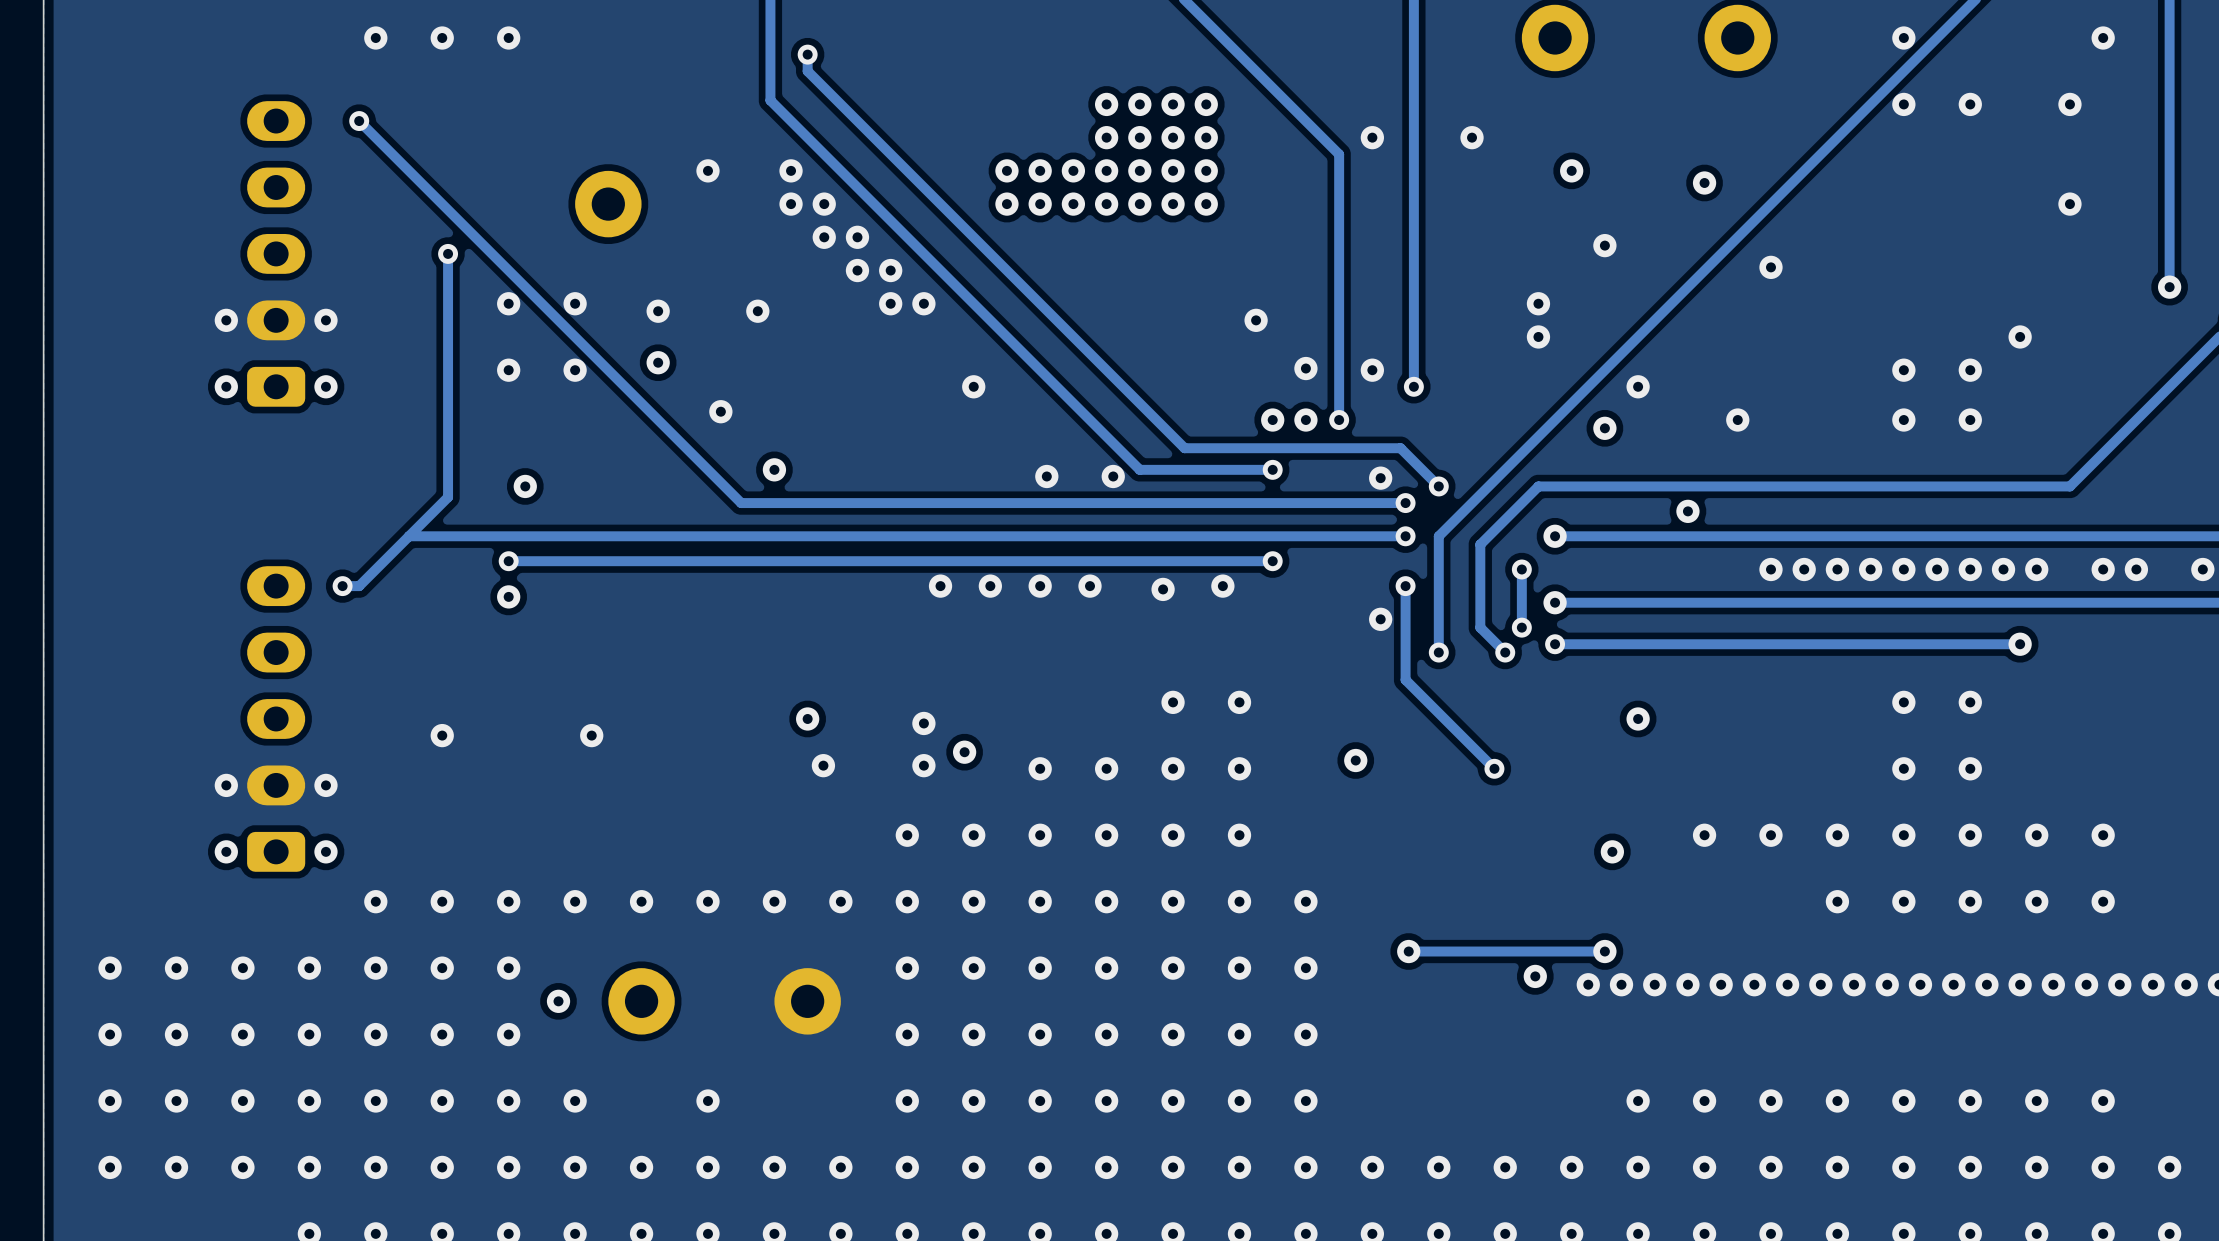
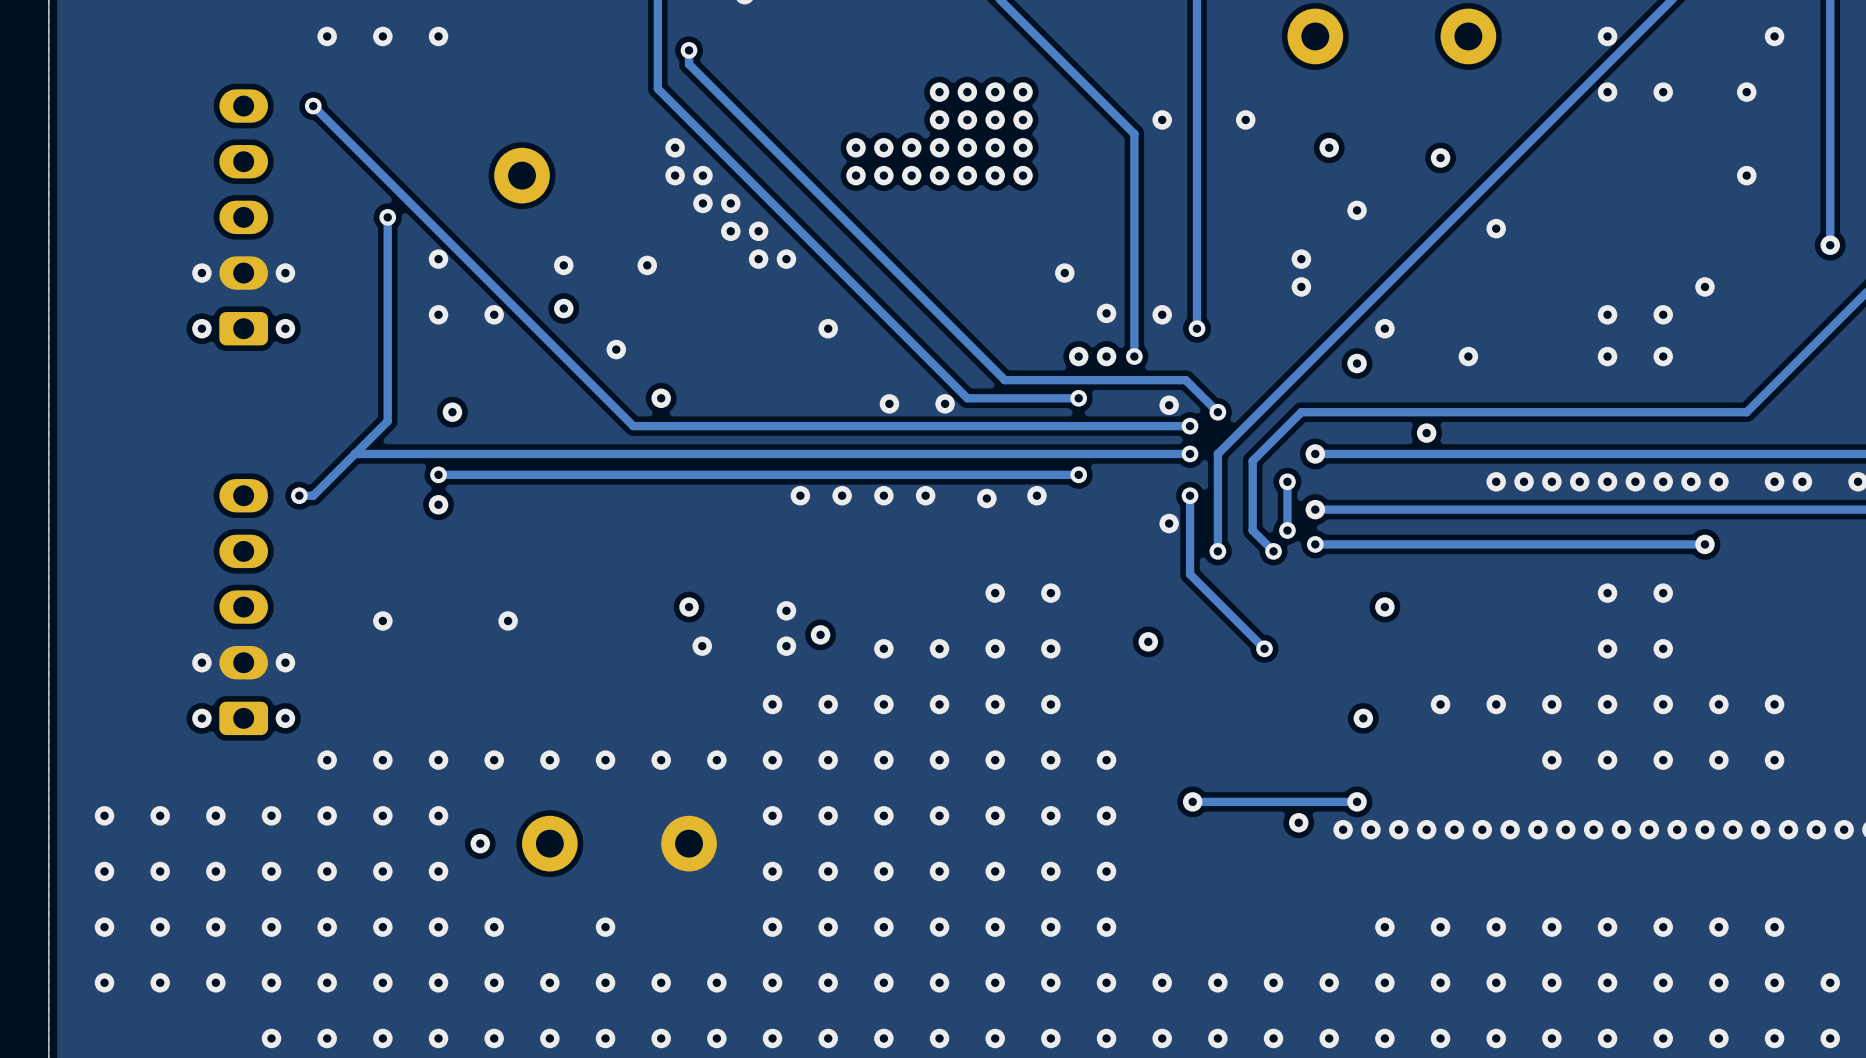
via: (707, 170) -> none
via: (575, 303) -> none

